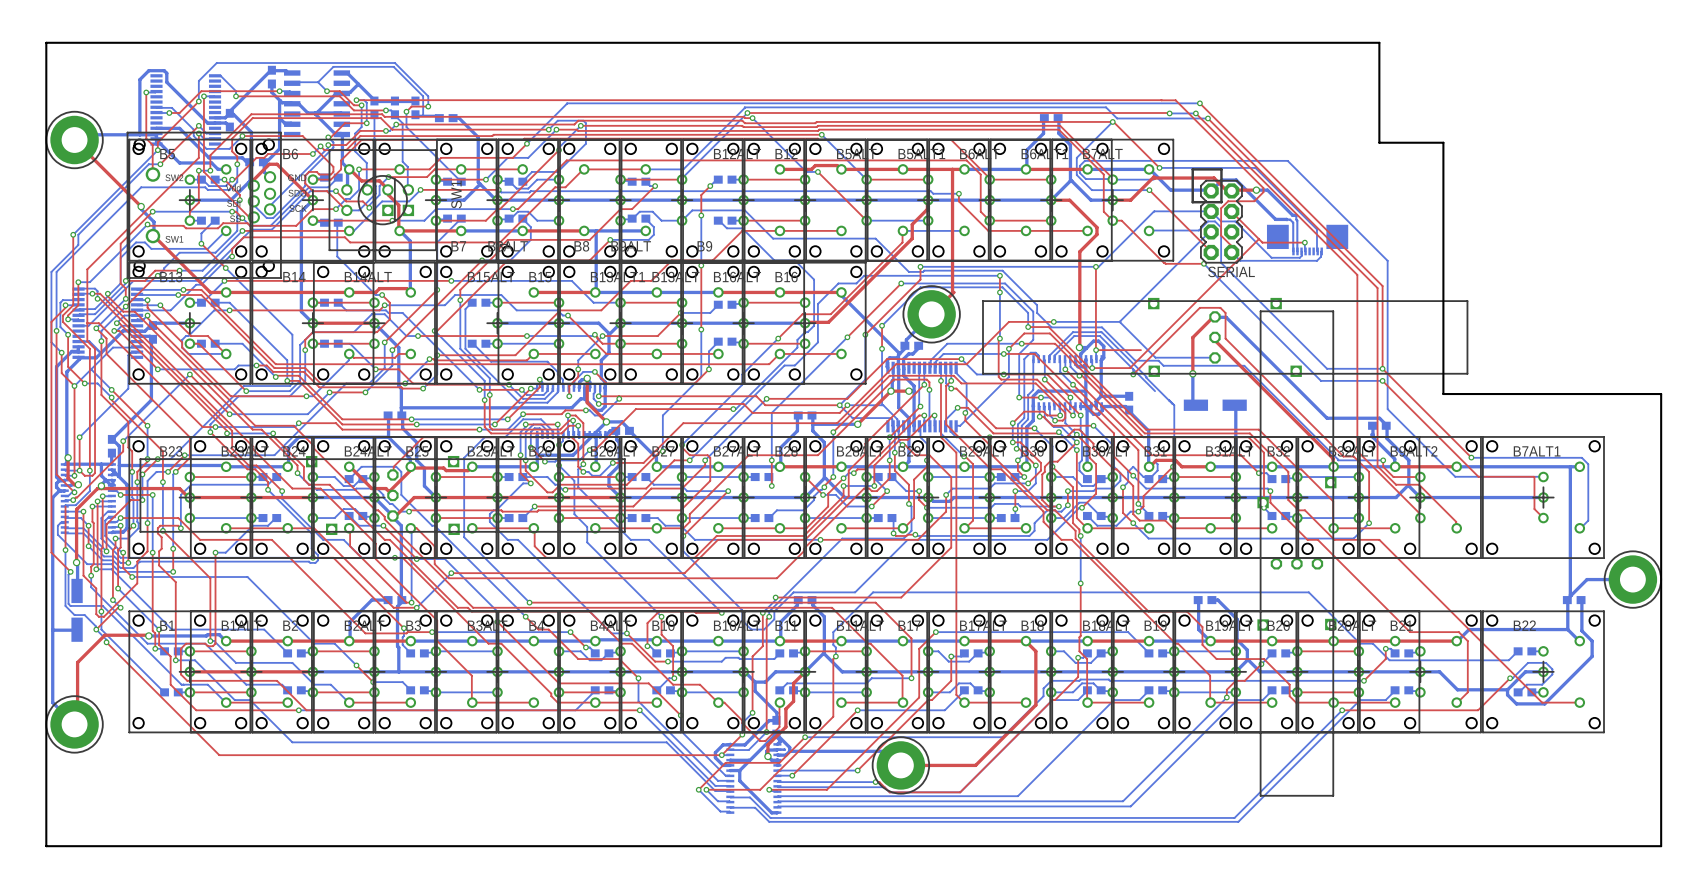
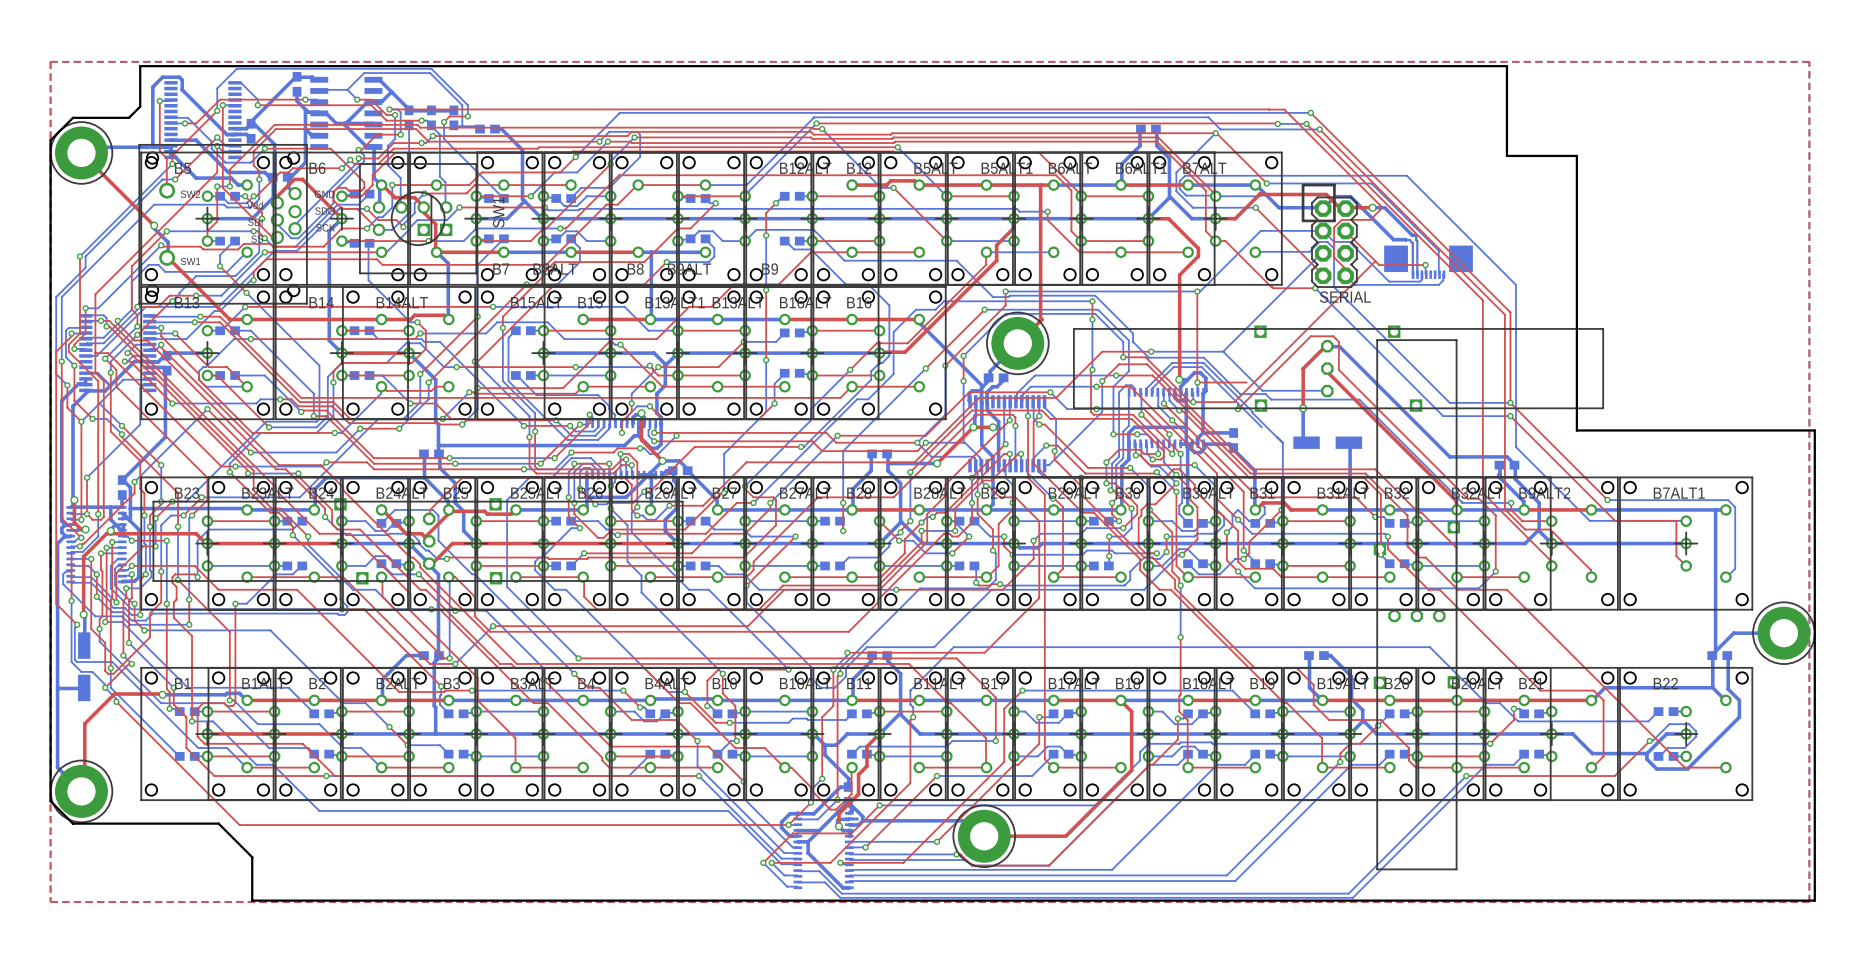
top zone outline: none -> (50, 61) (1809, 61) (1809, 902) (50, 902) (50, 61)
board edge: (1379, 60) (1379, 42) (46, 42) (46, 128) -> (1506, 66) (140, 66) (140, 106) (129, 117) (73, 117) (50, 140)
board edge: (46, 733) (46, 846) (1661, 846) (1661, 824) -> (50, 801) (73, 823) (218, 823) (252, 857) (252, 900) (1814, 900)

